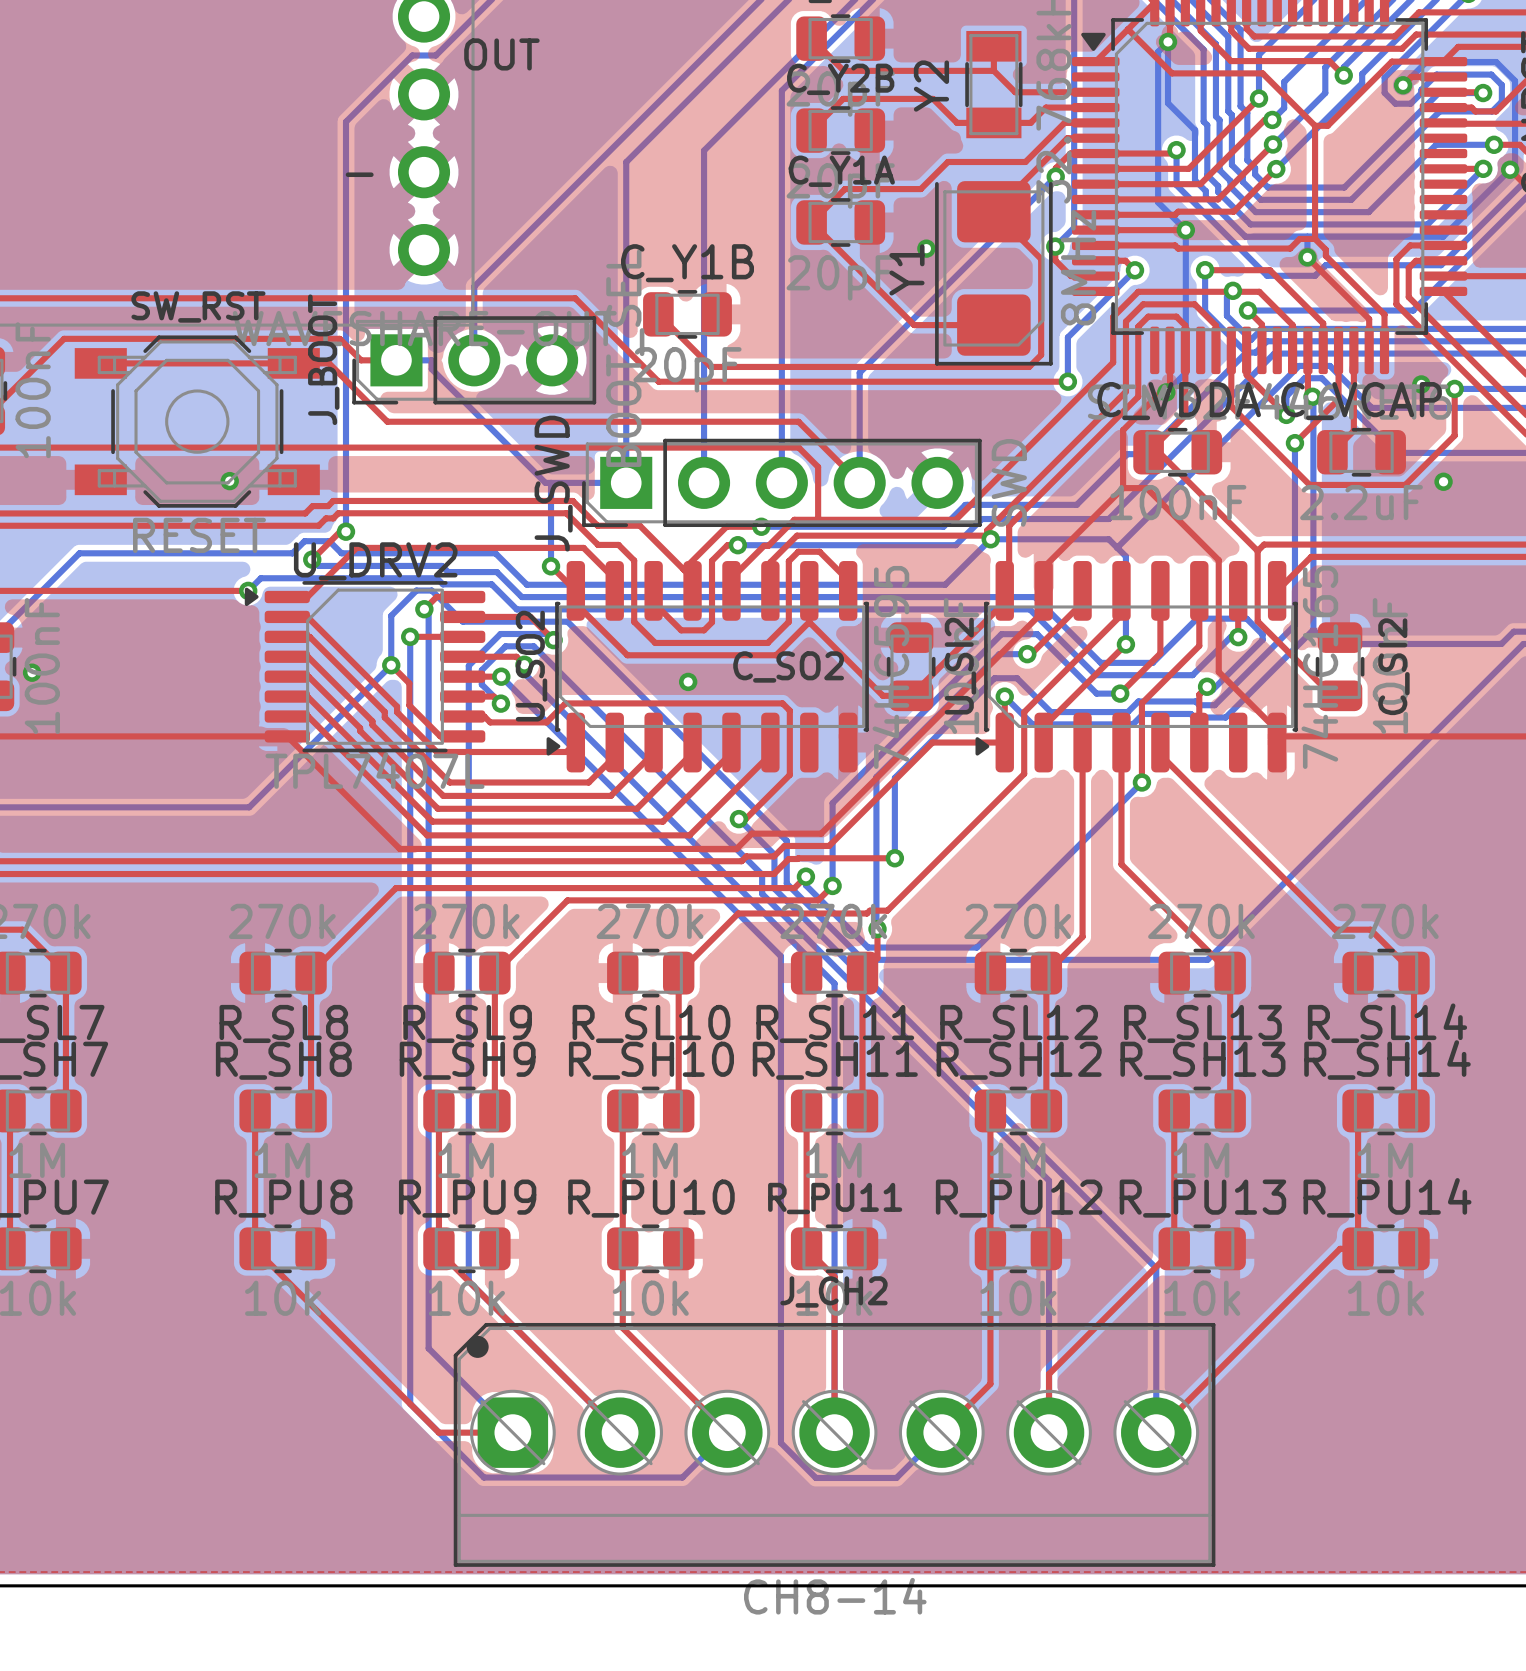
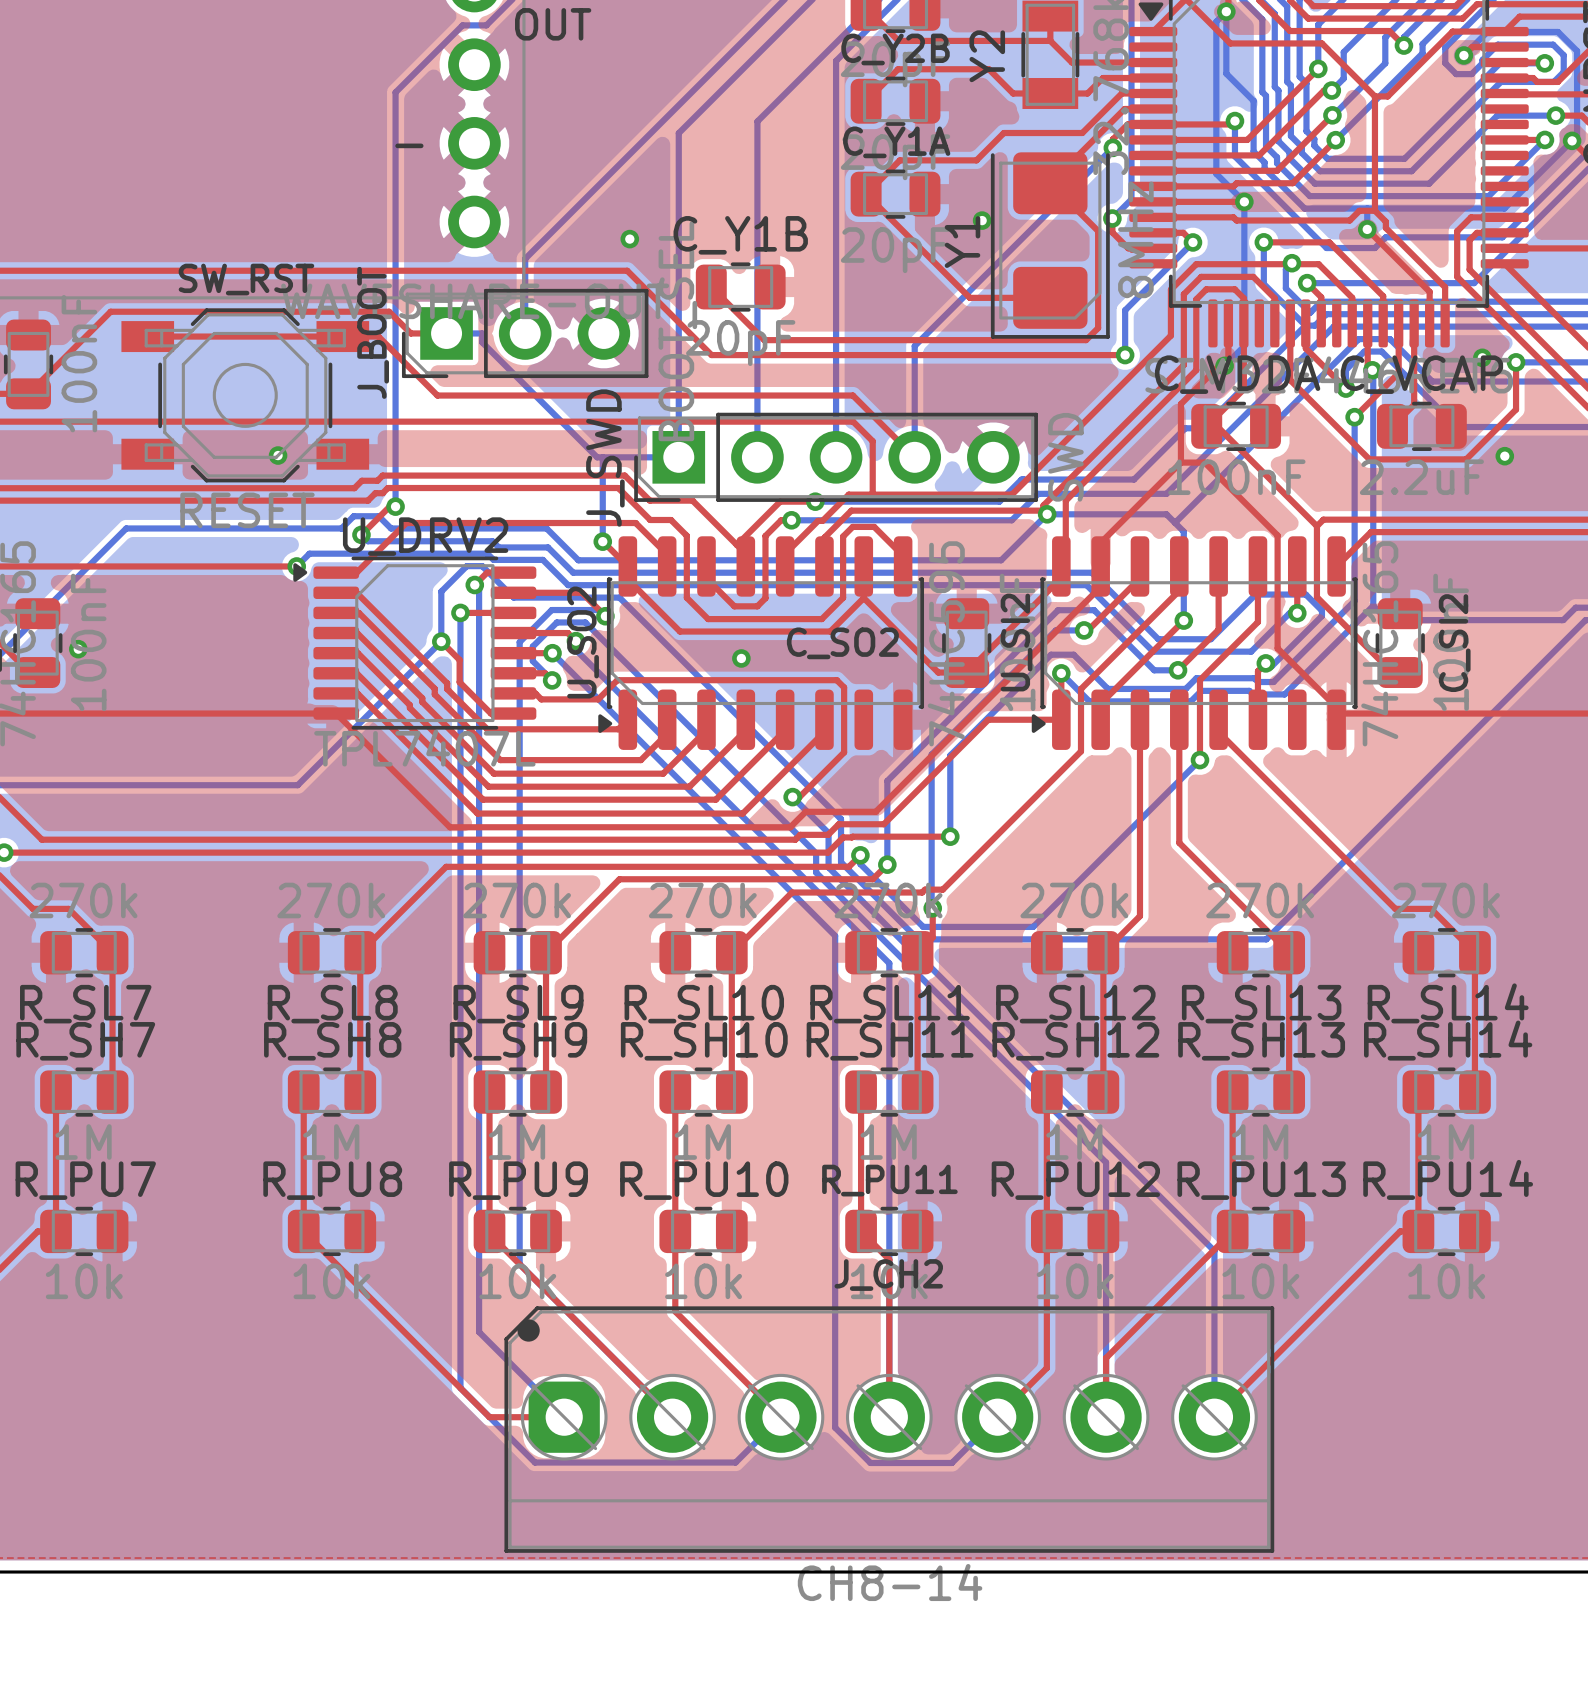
via: none -> (629, 239)

